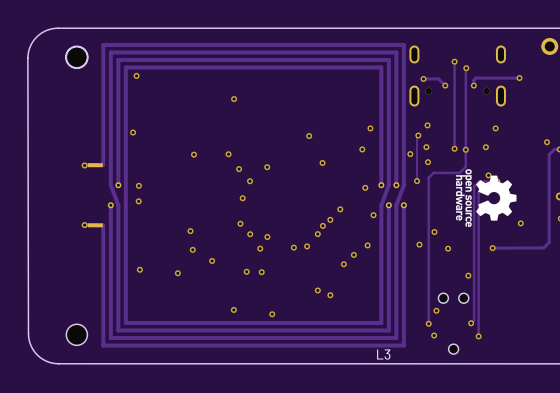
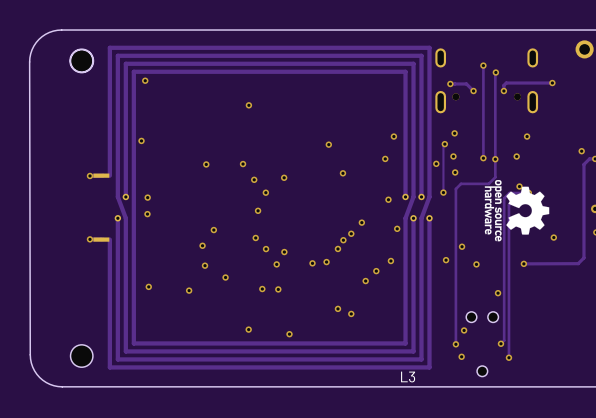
via: none -> (213, 230)

